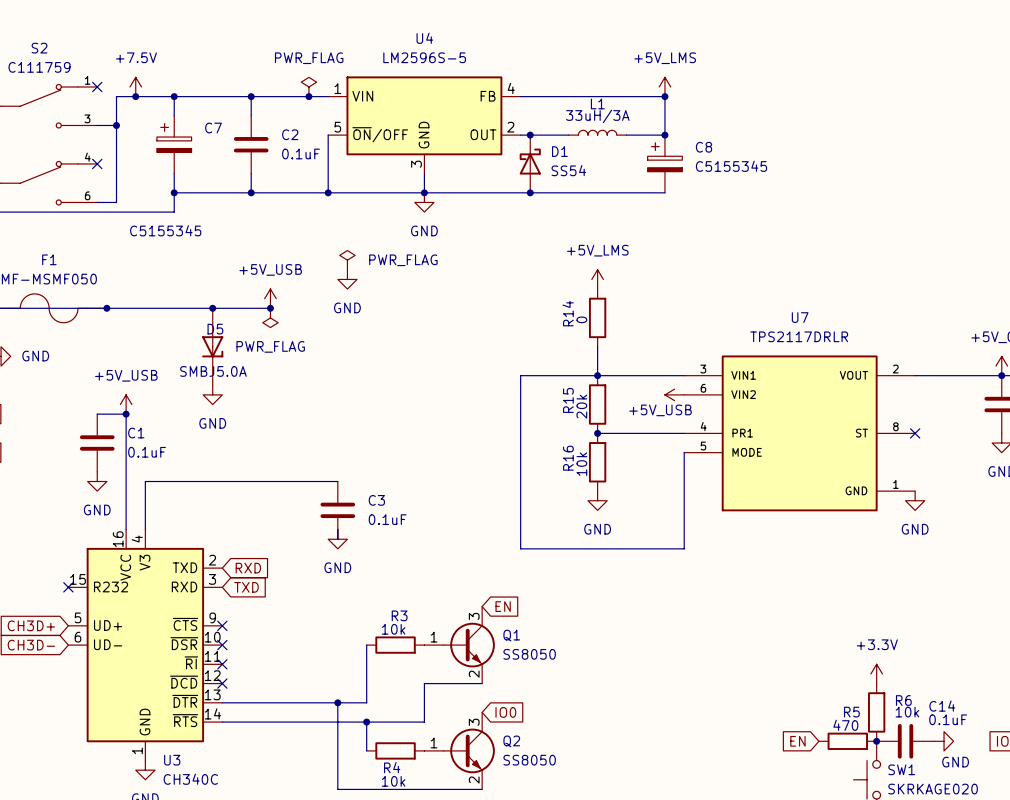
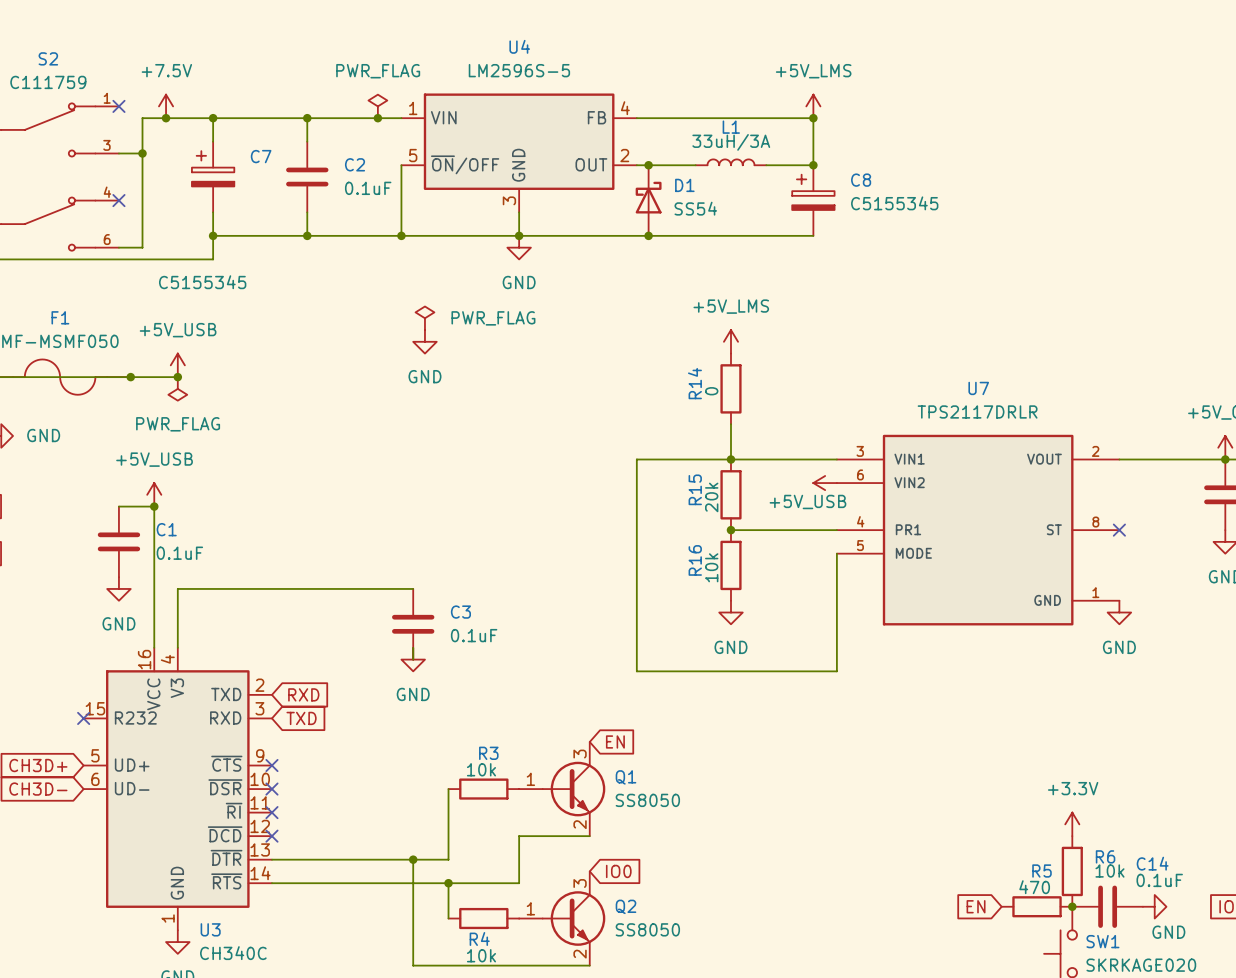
power symbol position: +5V_USB (270, 298) -> +5V_USB (177, 365)
wire: (145, 308) (270, 308) -> none
junction: none -> (177, 377)
junction: (212, 308) -> none
junction: (270, 308) -> none
power symbol position: PWR_FLAG (270, 317) -> PWR_FLAG (177, 388)
D5: SMBJ5.0A (212, 346) -> none
power symbol: GND (212, 394) -> none

